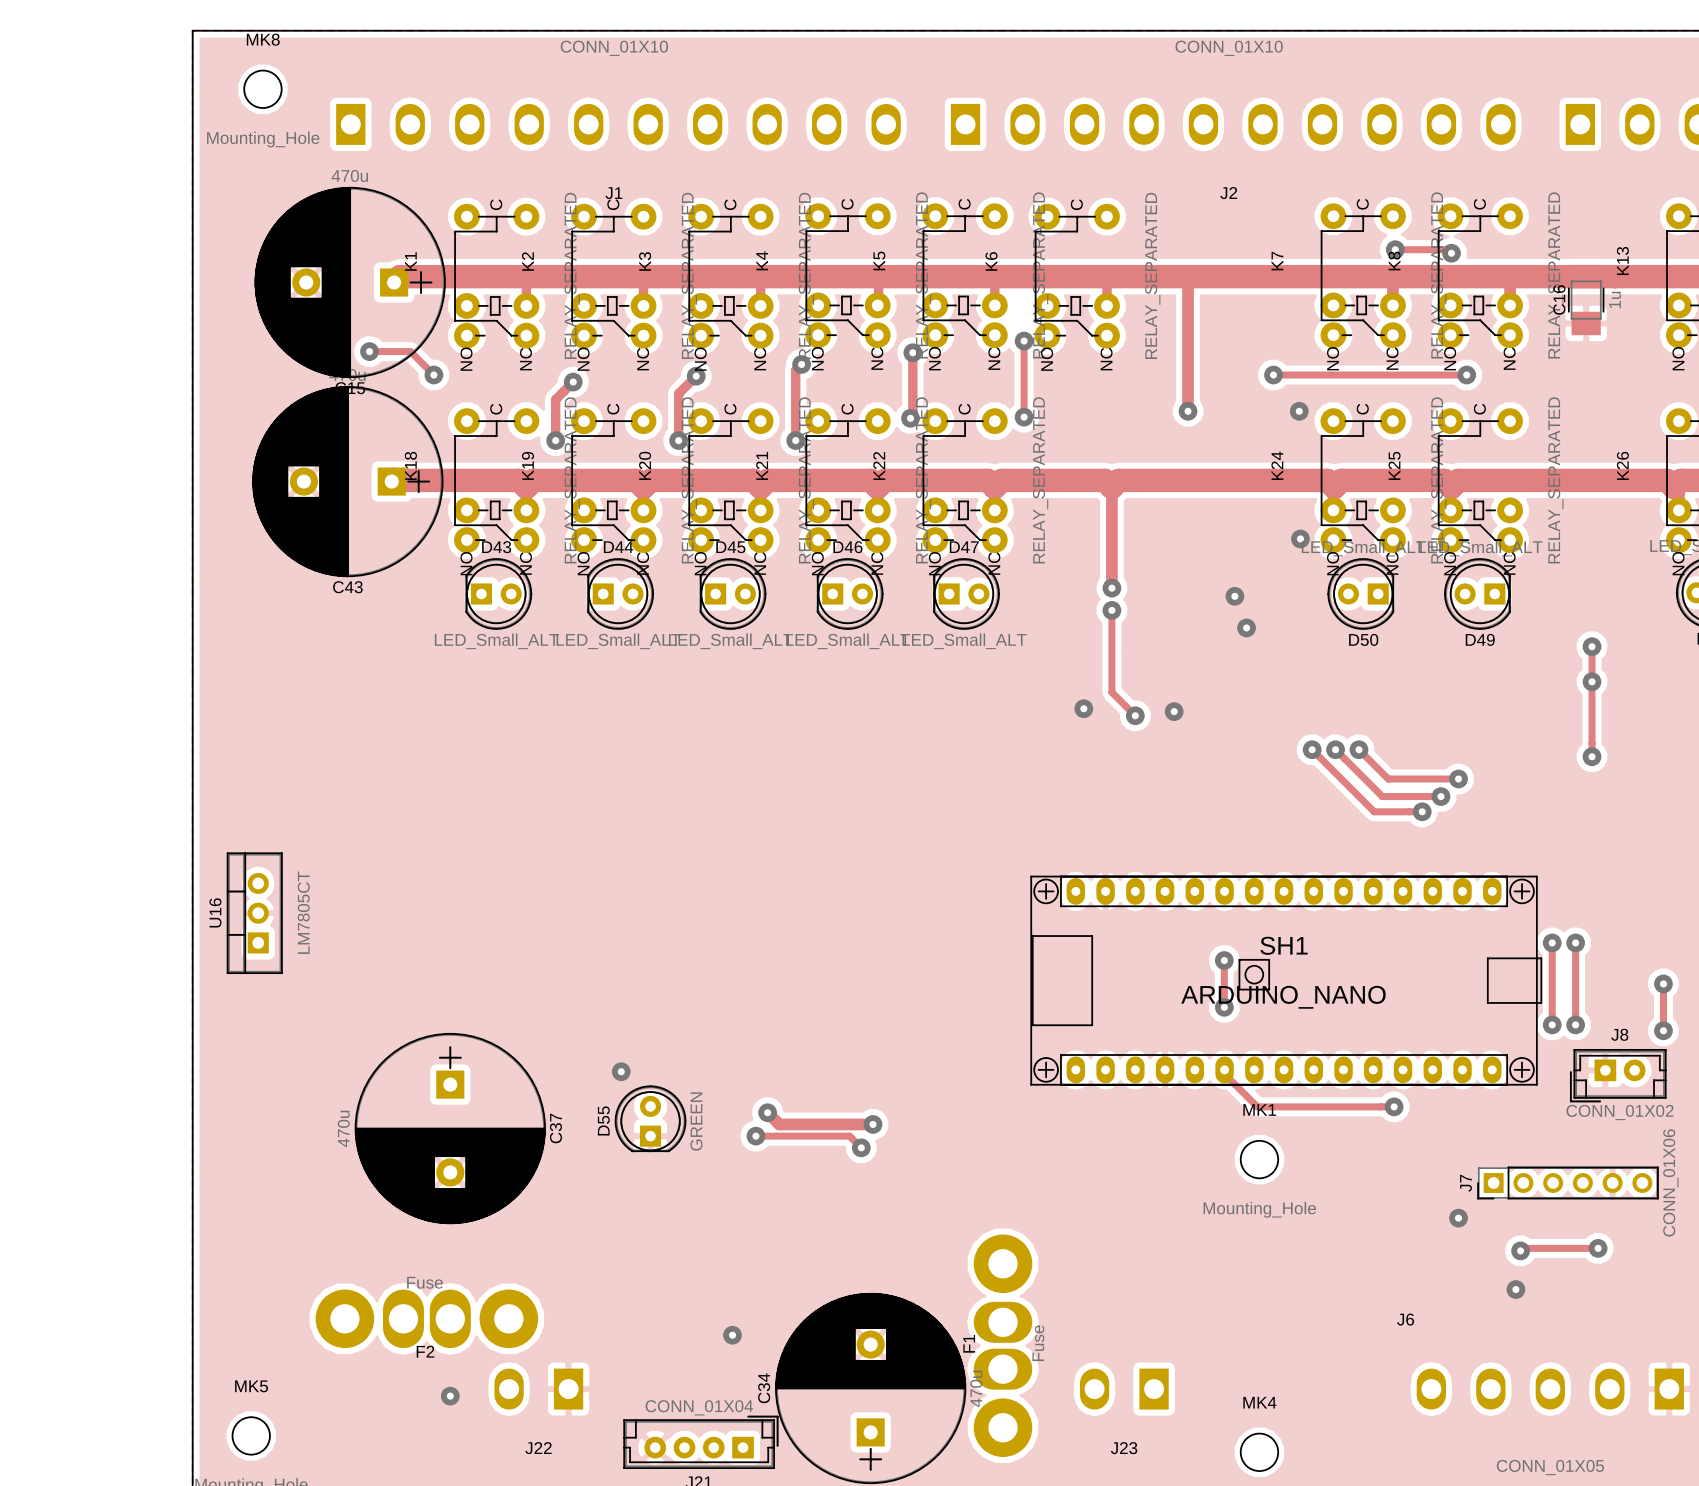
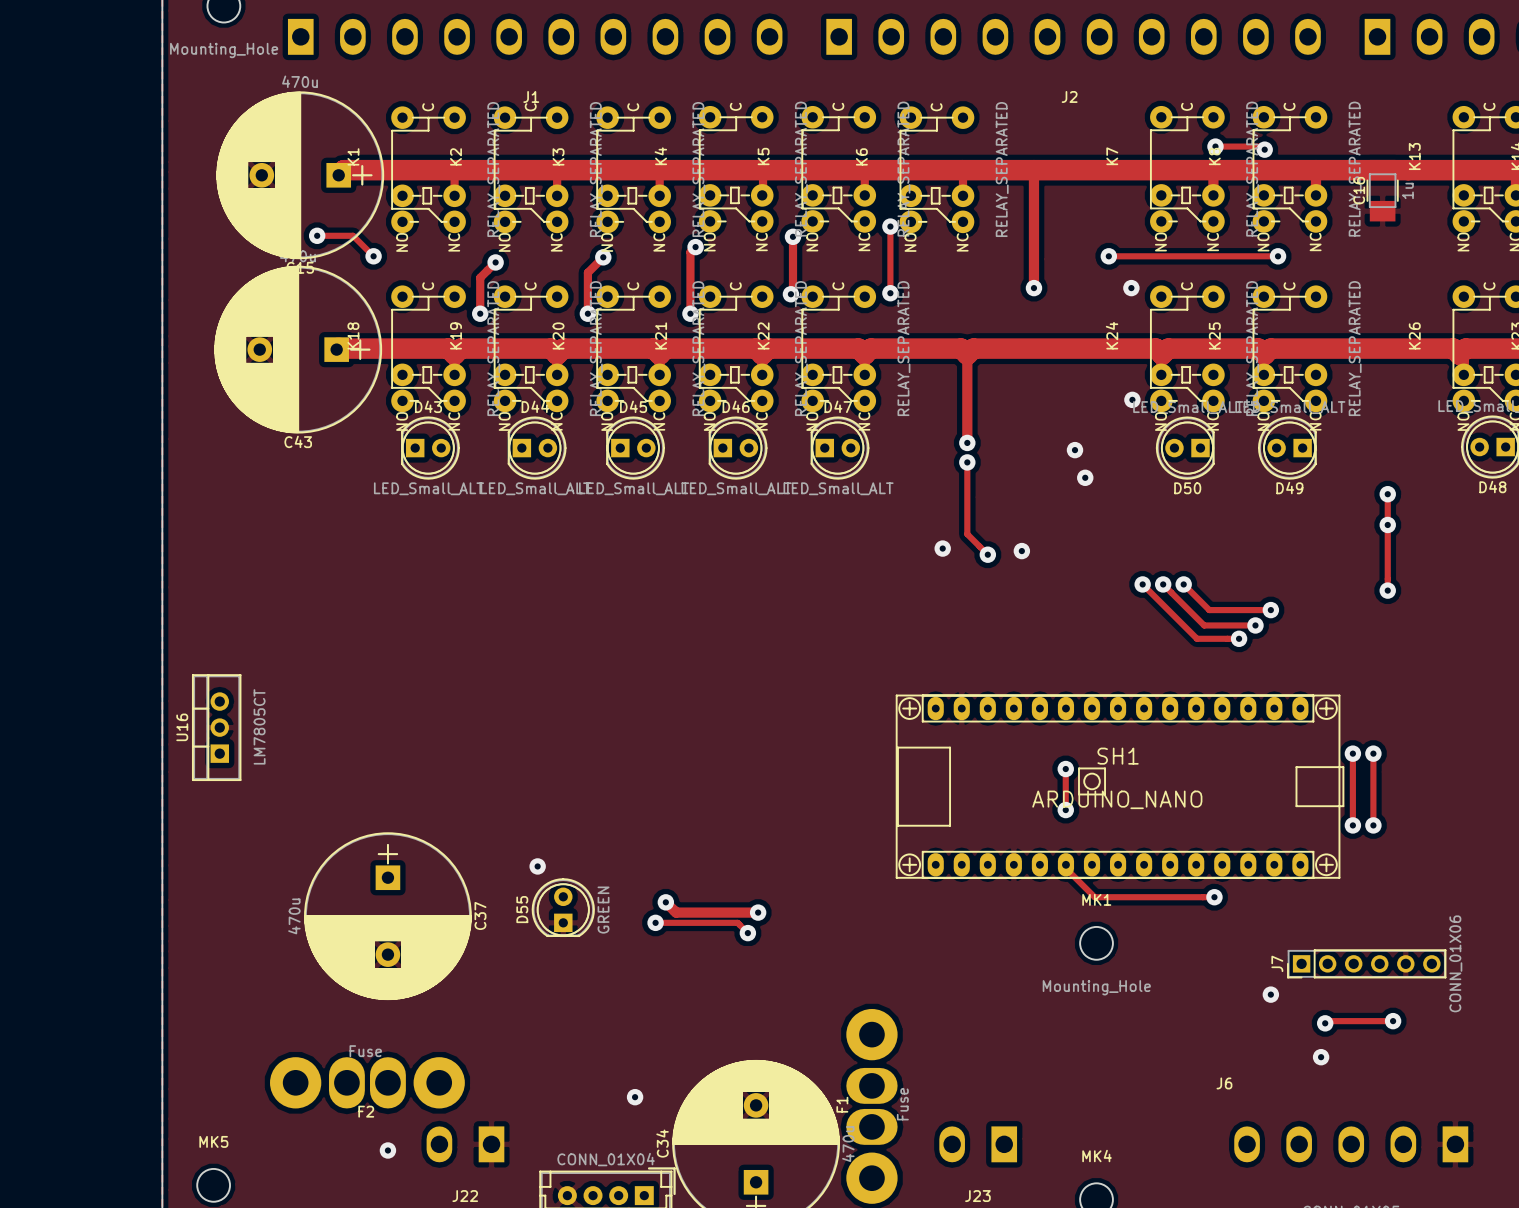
track: (1663, 983) (1663, 1030) -> none
via: (1663, 983) -> none
via: (1663, 1030) -> none
J8: CONN_01X02 (1618, 1075) -> none

